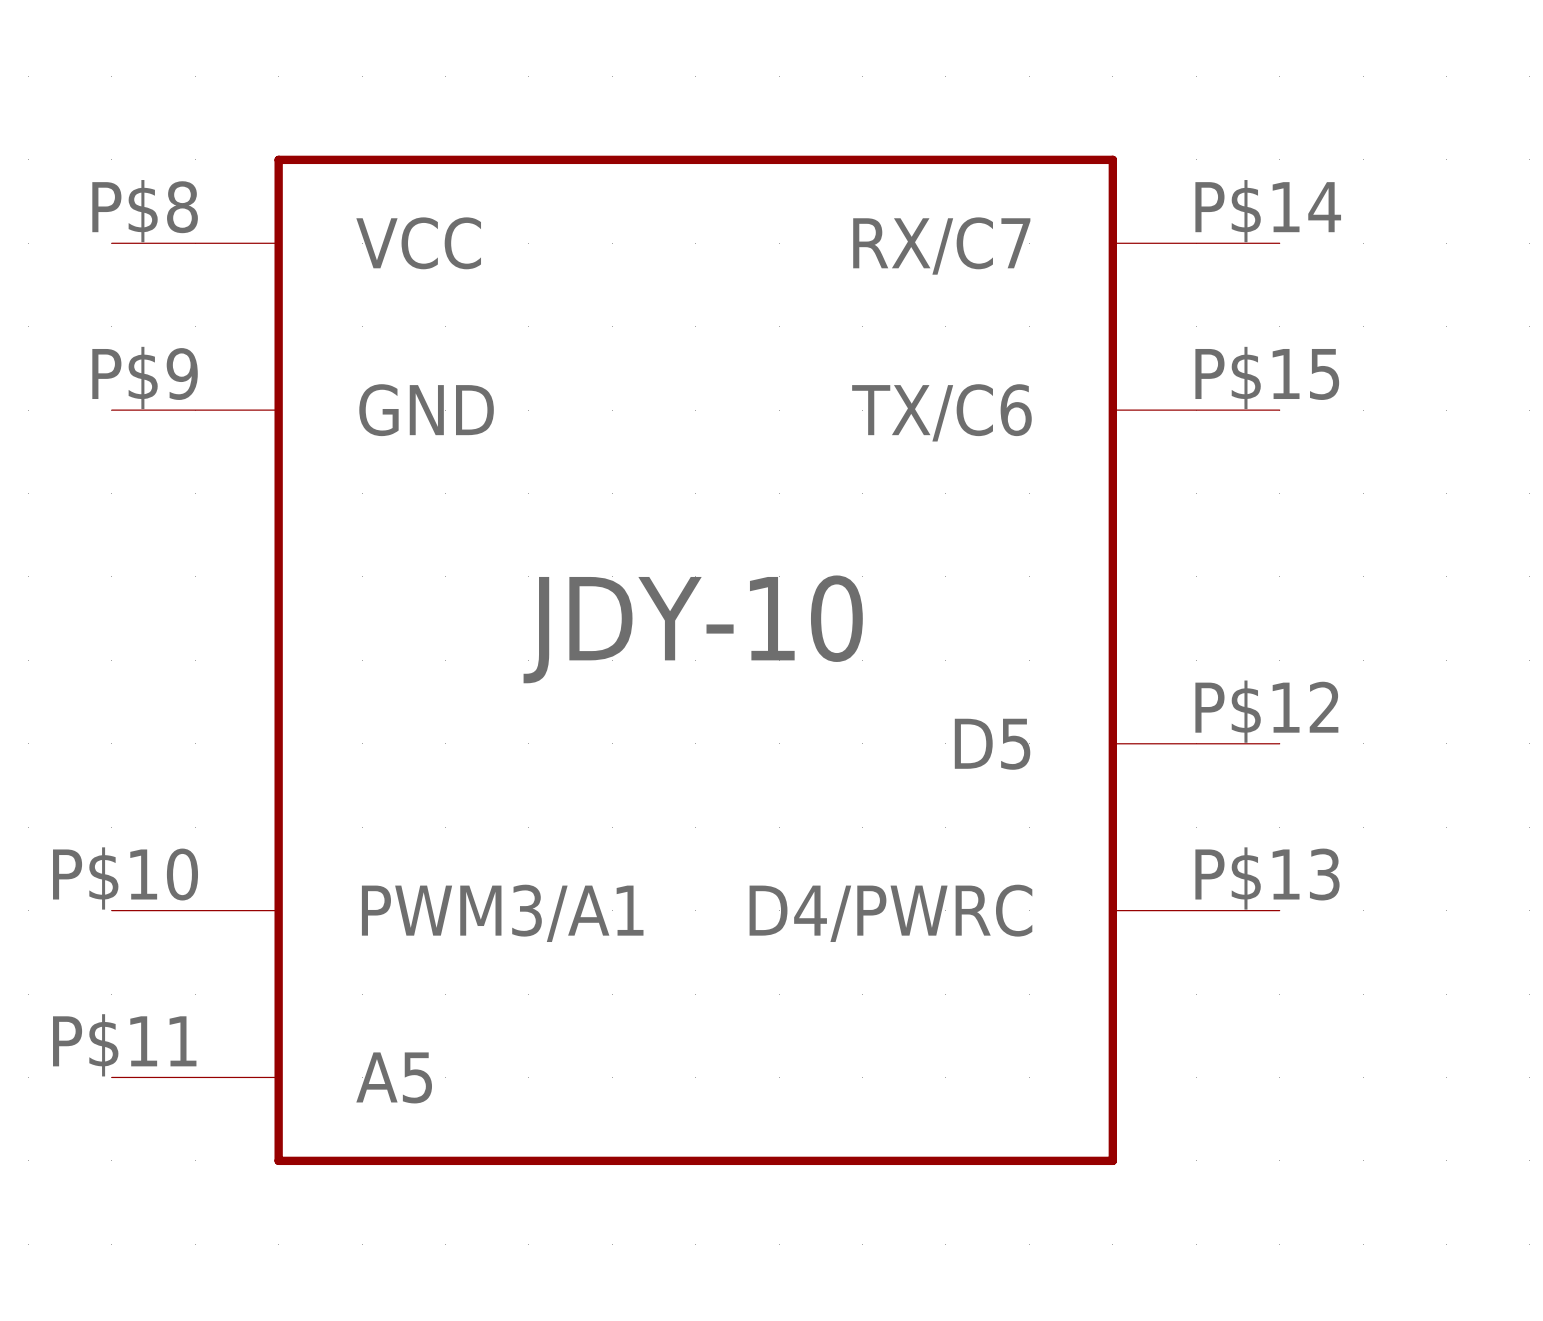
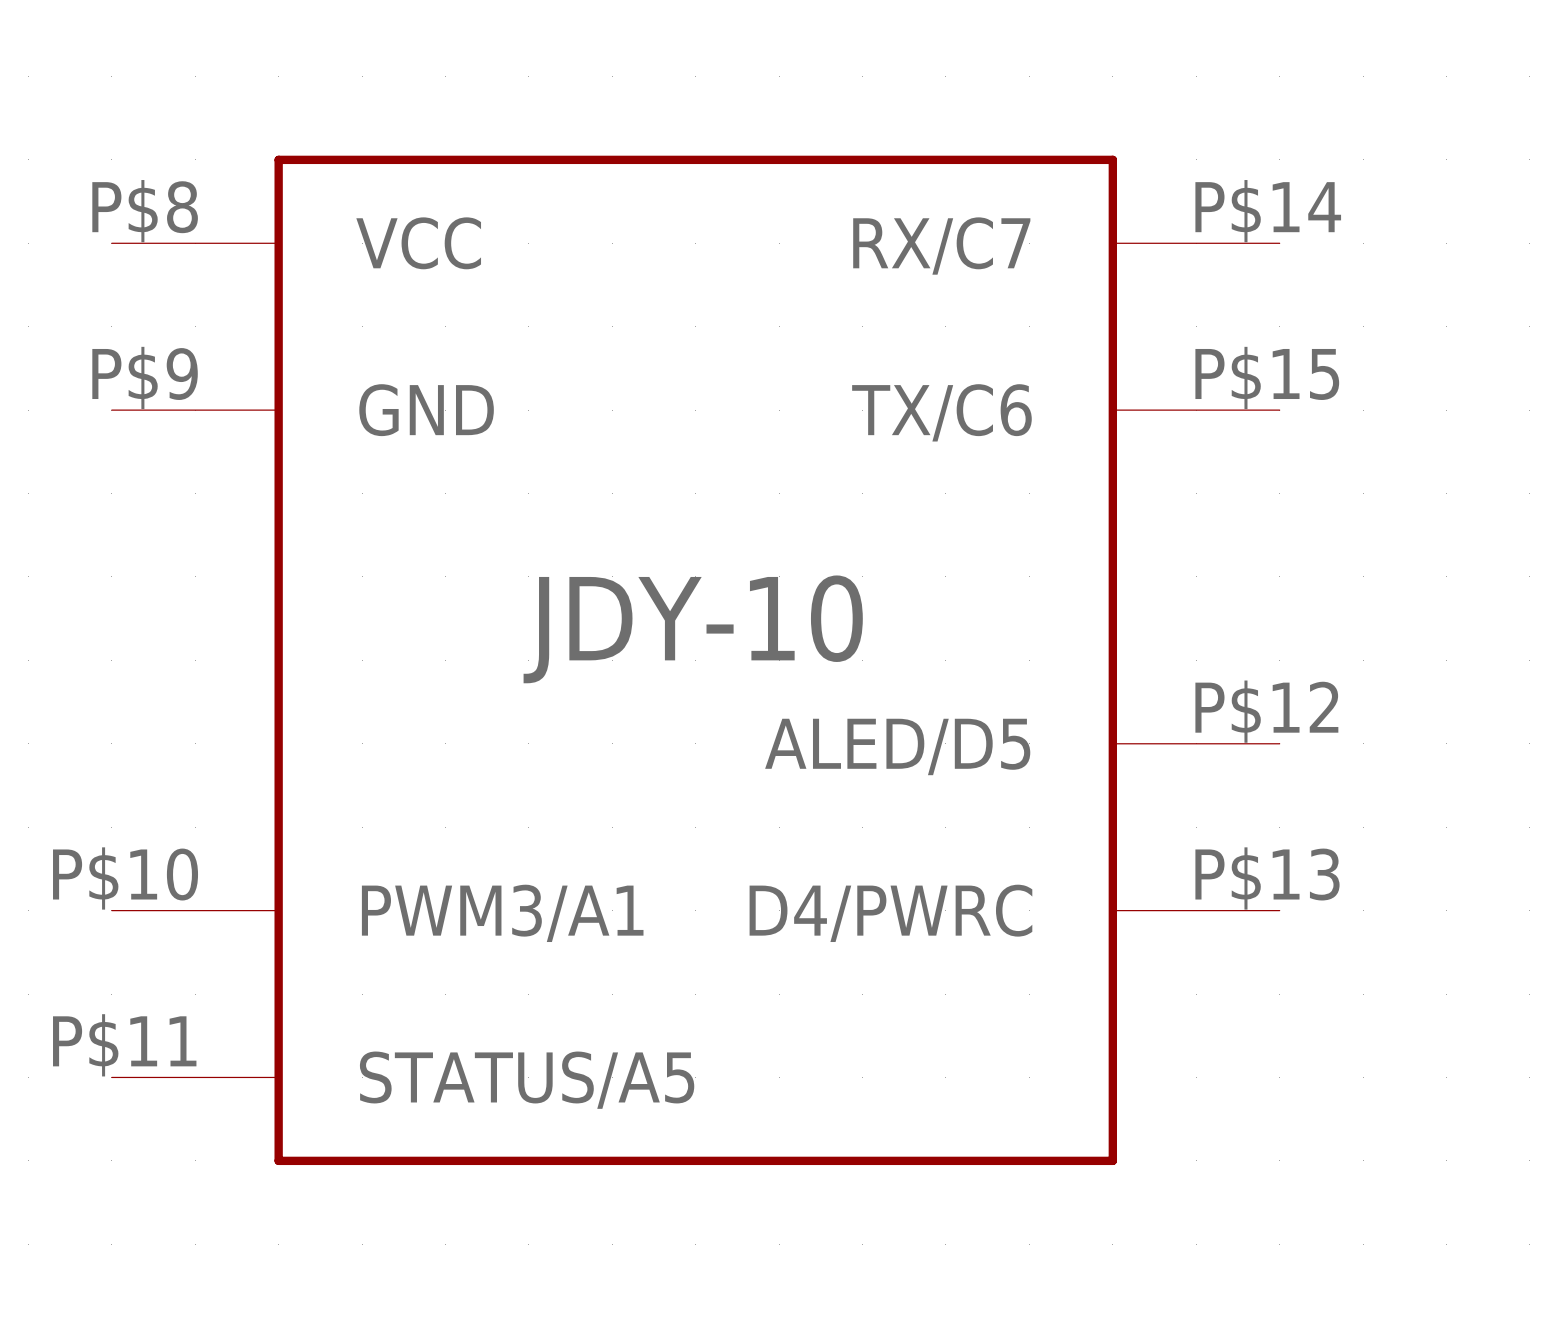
part pin name: D5 (992, 744) -> ALED/D5 (897, 746)
part pin name: A5 (394, 1077) -> STATUS/A5 (527, 1080)

